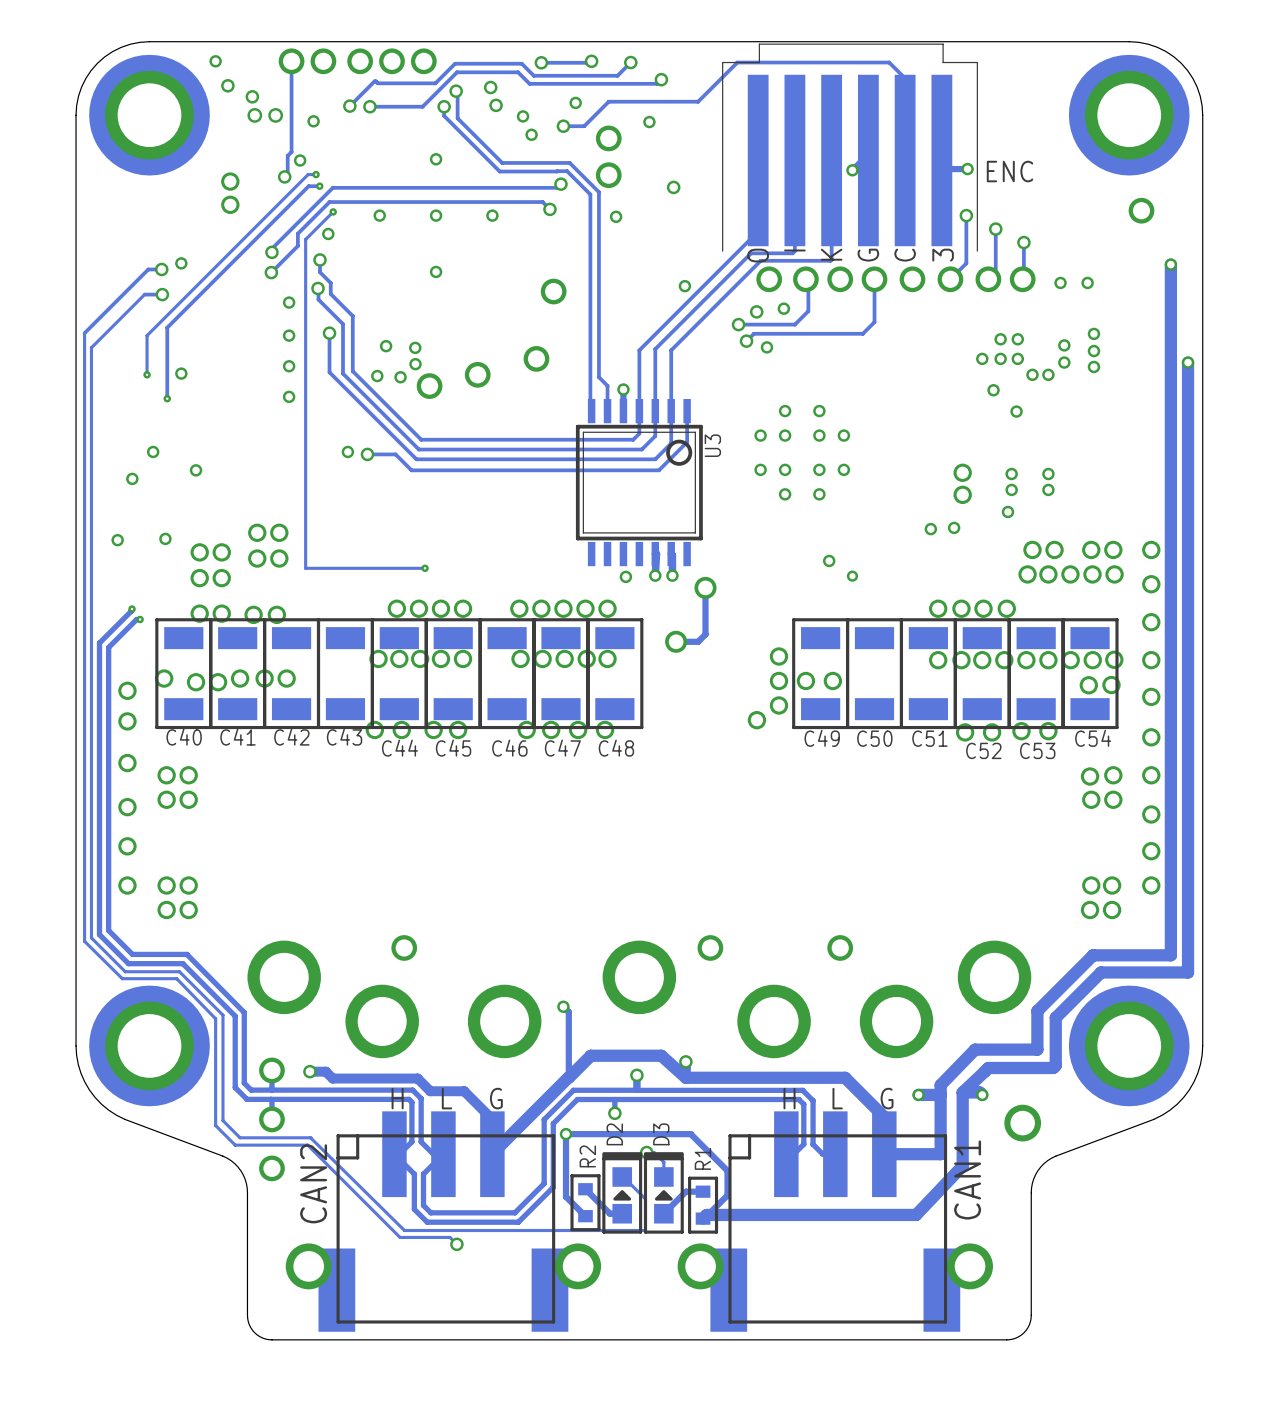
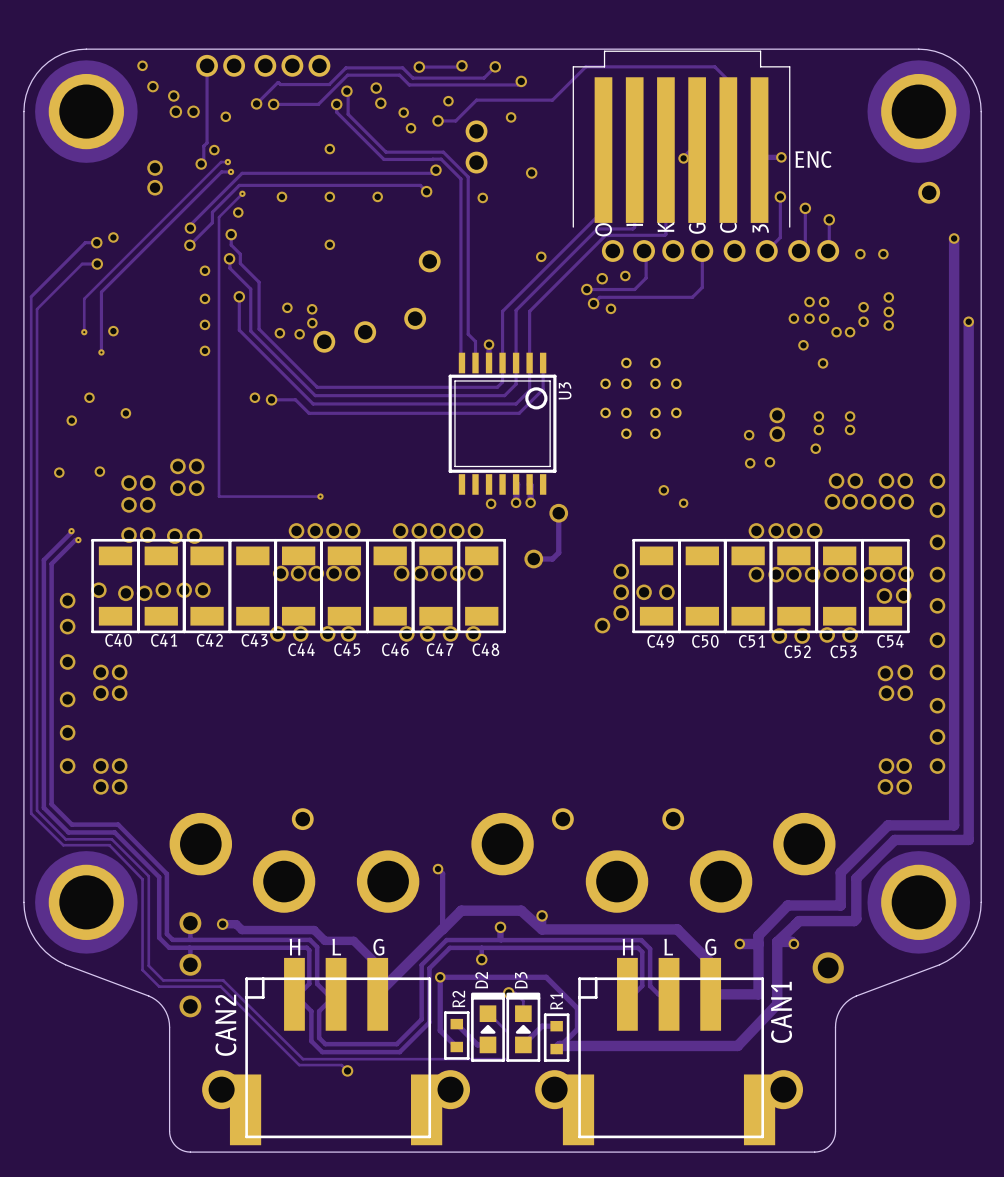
via: none -> (749, 435)

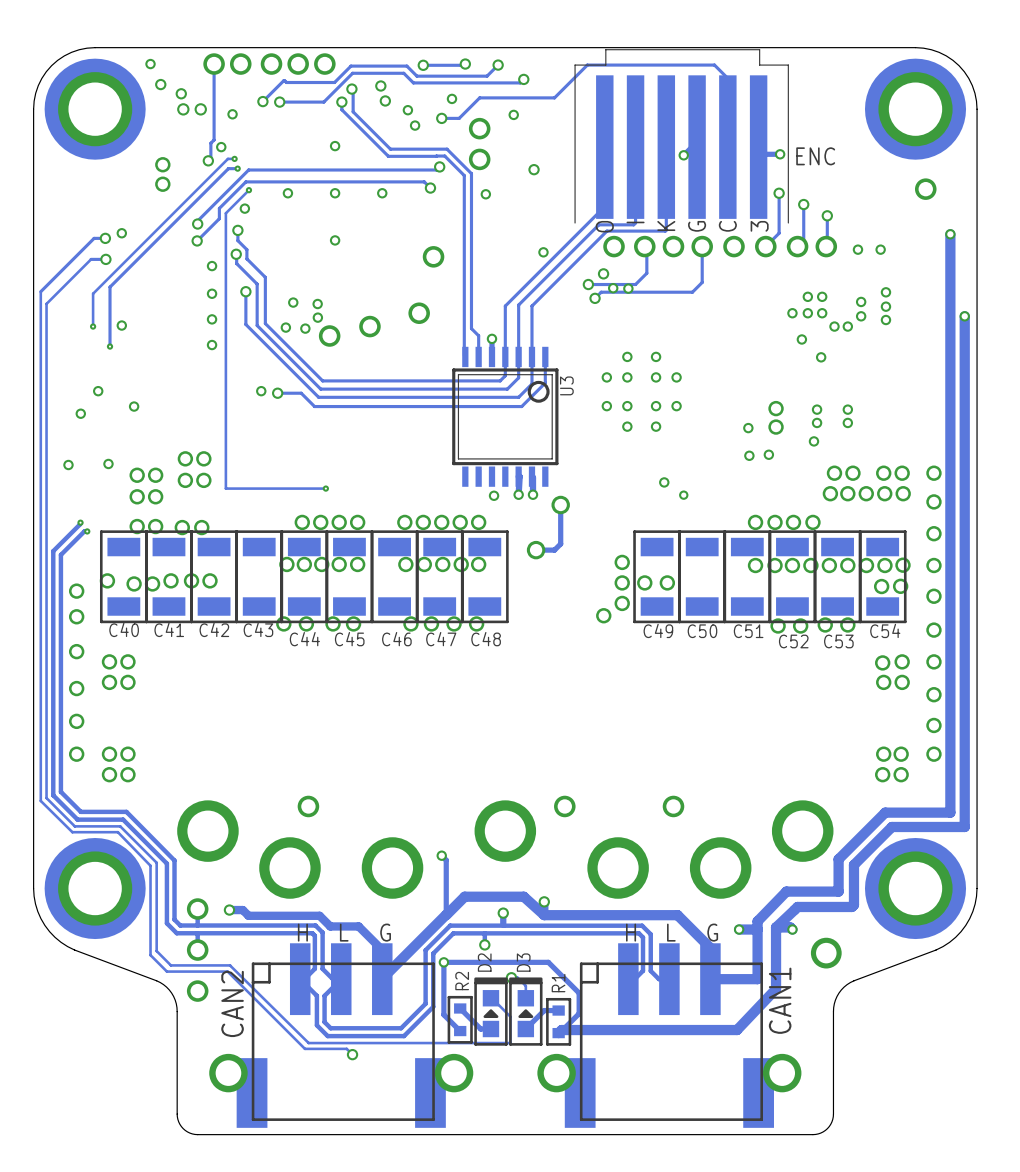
via: (625, 275) -> none
via: none -> (613, 288)
via: none -> (628, 288)
via: (610, 308) -> none

